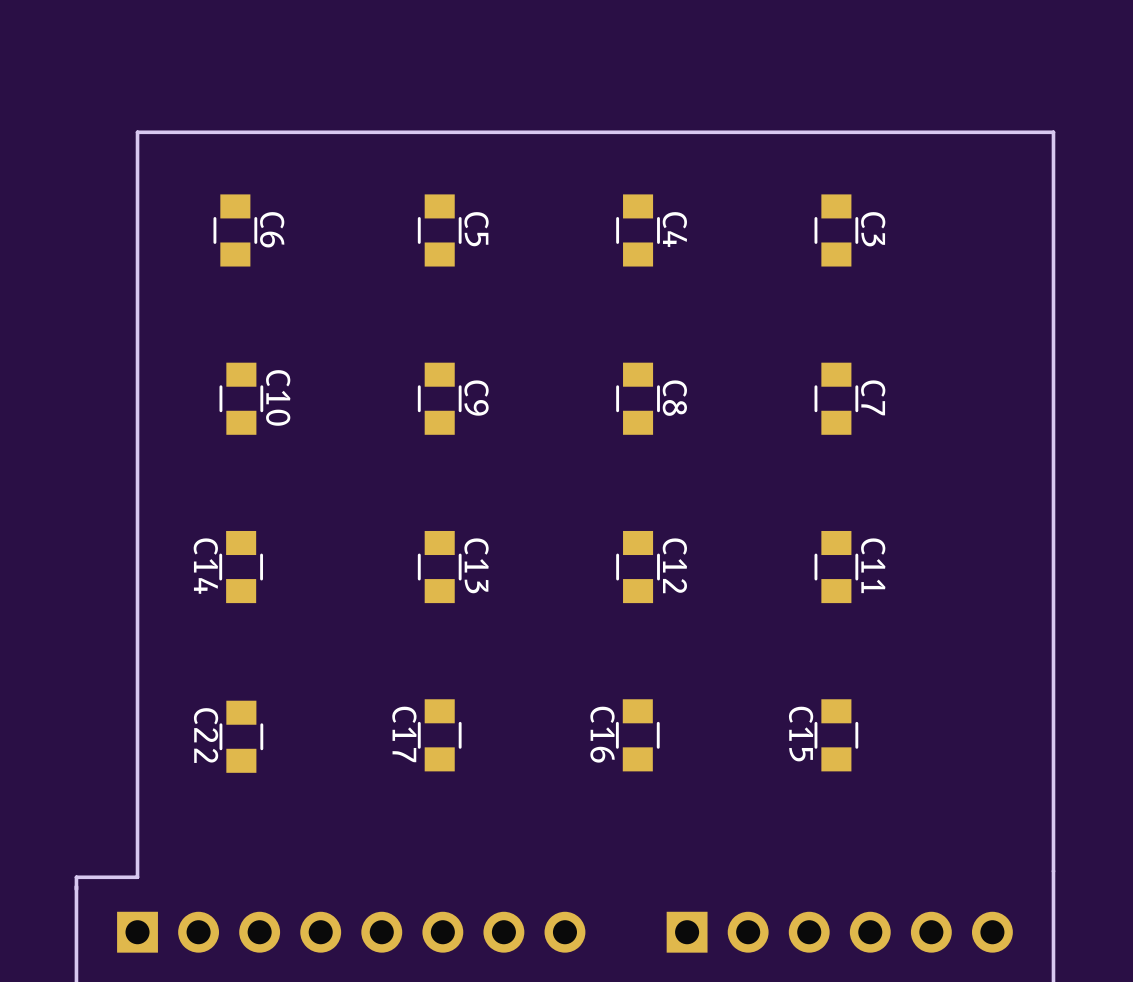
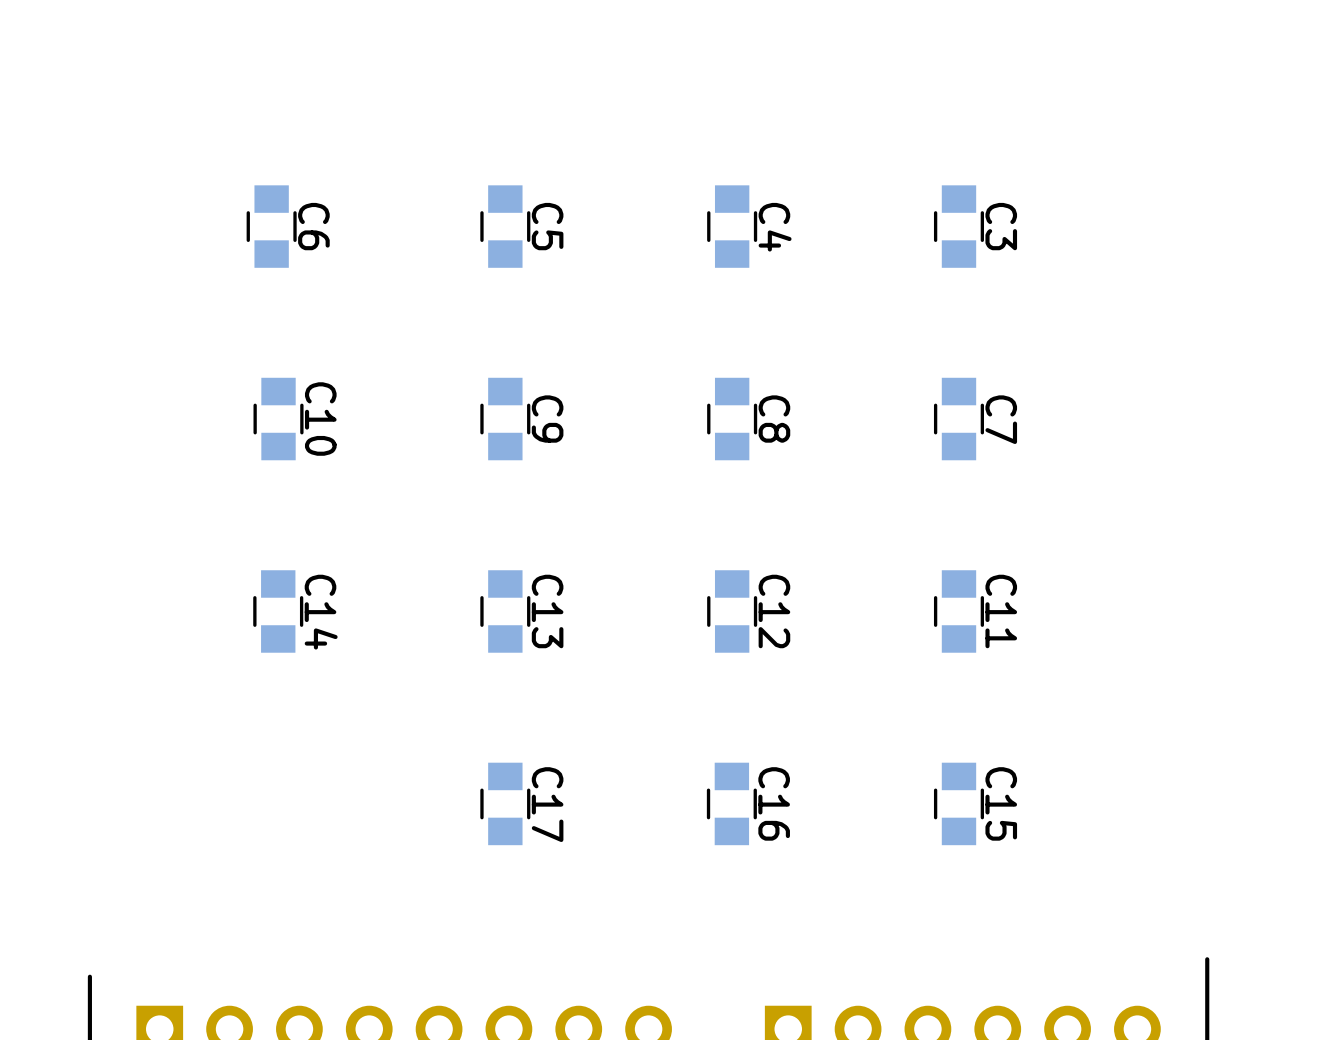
C14 name position: C14 (205, 566) -> C14 (321, 612)
C17 name position: C17 (404, 734) -> C17 (547, 804)
C16 name position: C16 (602, 734) -> C16 (774, 803)
C15 name position: C15 (801, 734) -> C15 (1001, 803)
C22: (241, 736) -> none
board edge: (1053, 871) (1053, 132) (137, 132) (137, 877) (76, 877) (76, 886) -> none

